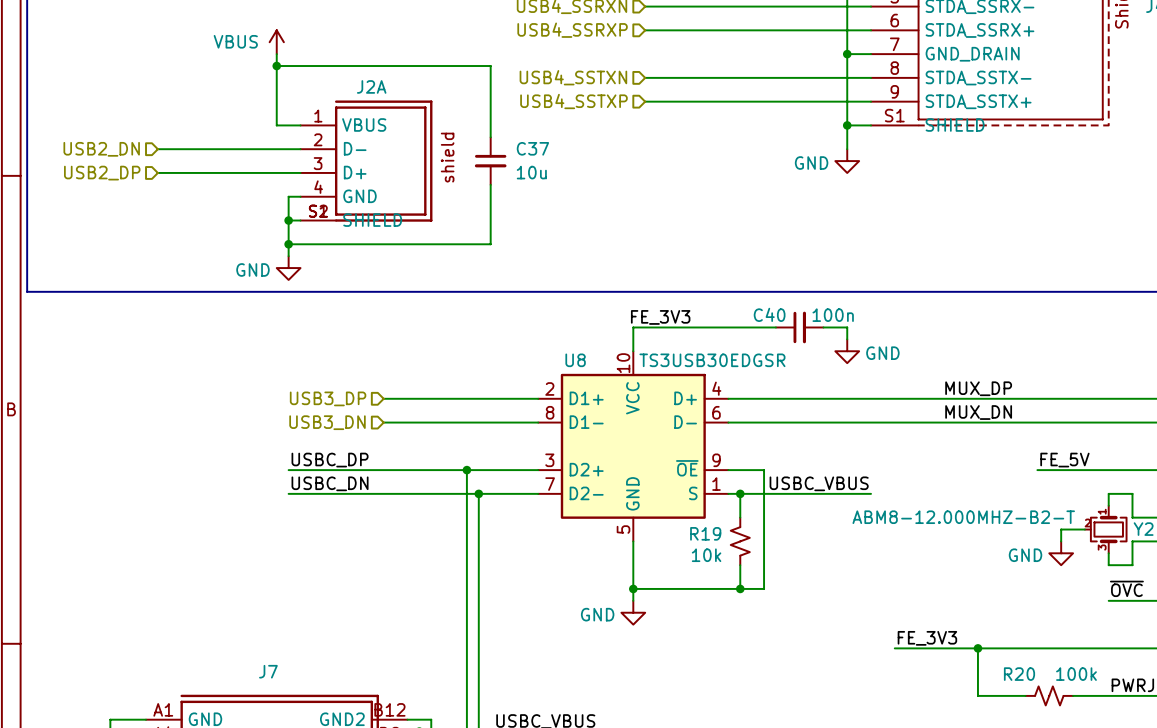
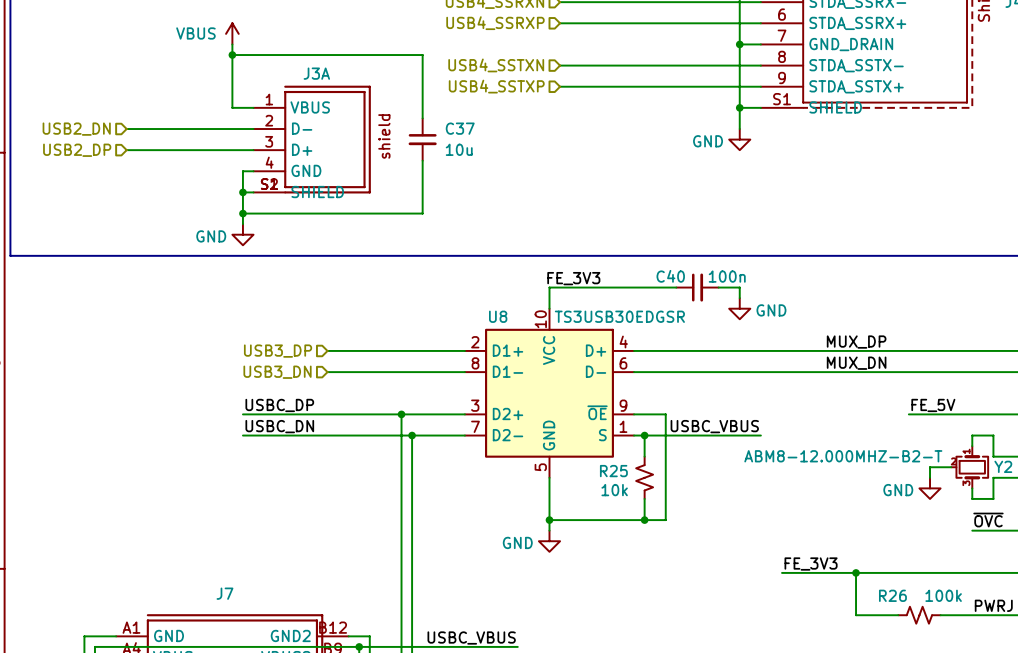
J2A name: J2A (371, 86) -> J3A (316, 73)
R19 name: R19 (705, 533) -> R25 (613, 471)
R20 name: R20 (1019, 674) -> R26 (892, 595)

